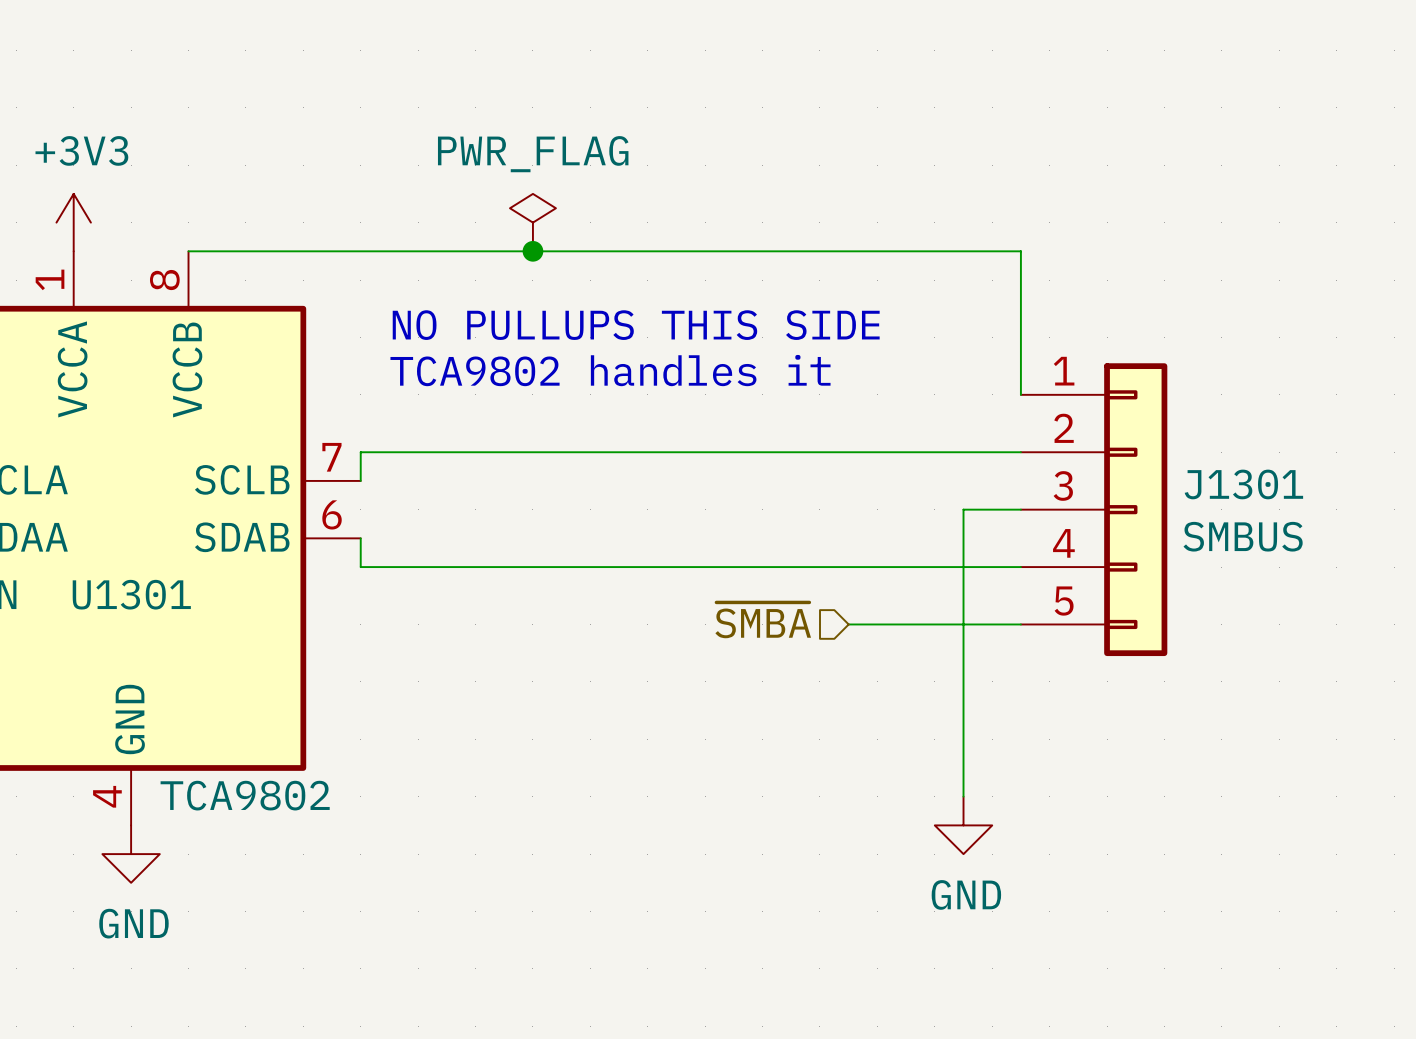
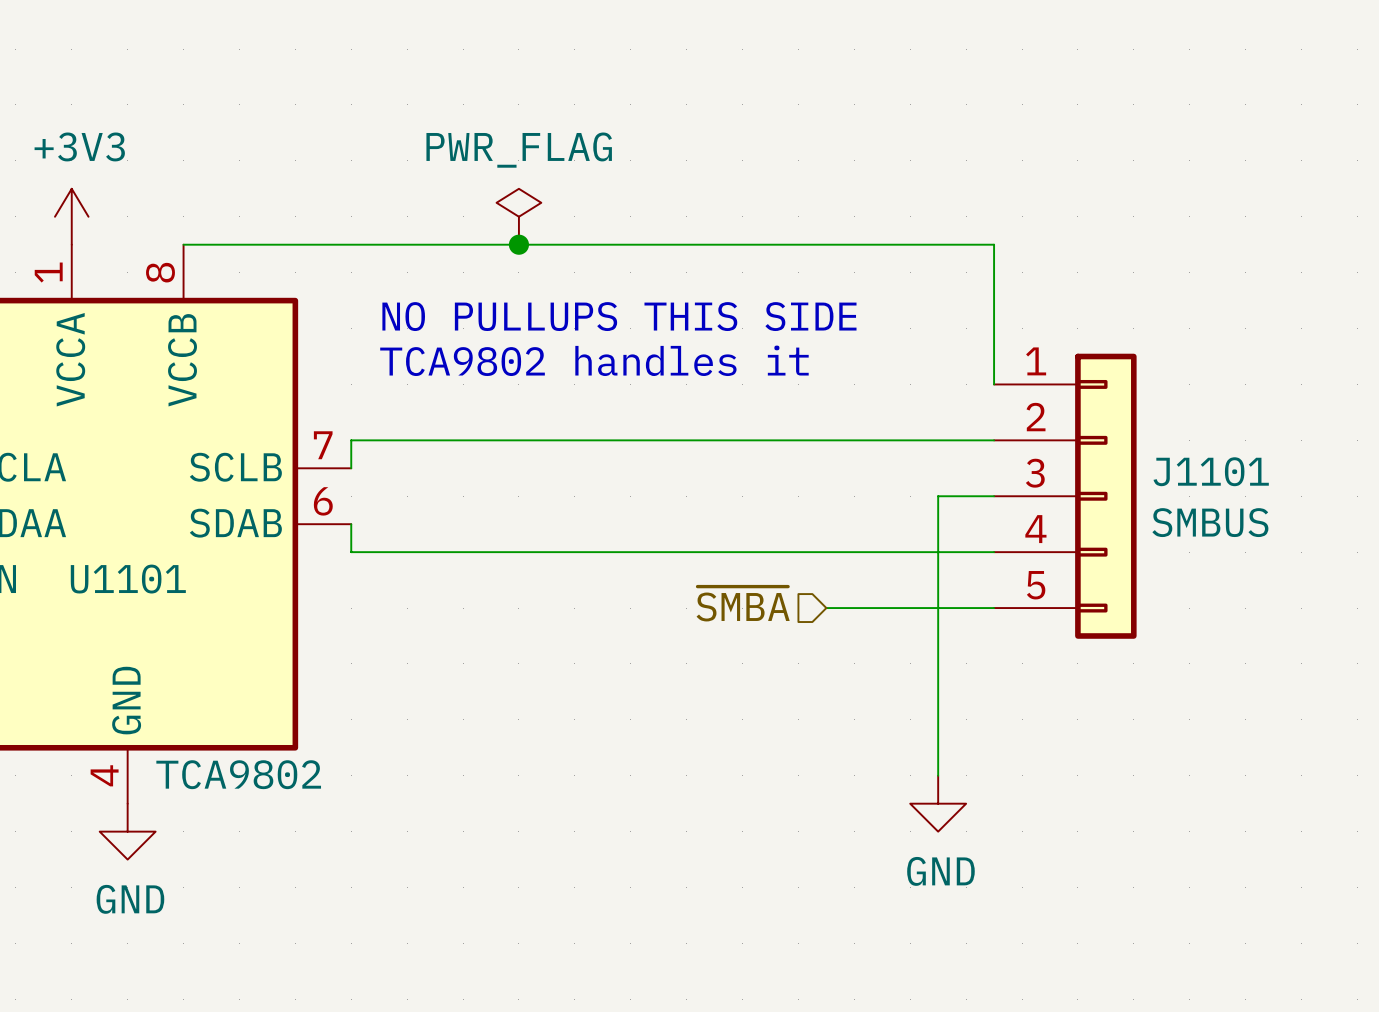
J1301 name: J1301 (1243, 484) -> J1101 (1211, 471)
U1301 name: U1301 (131, 594) -> U1101 (128, 579)

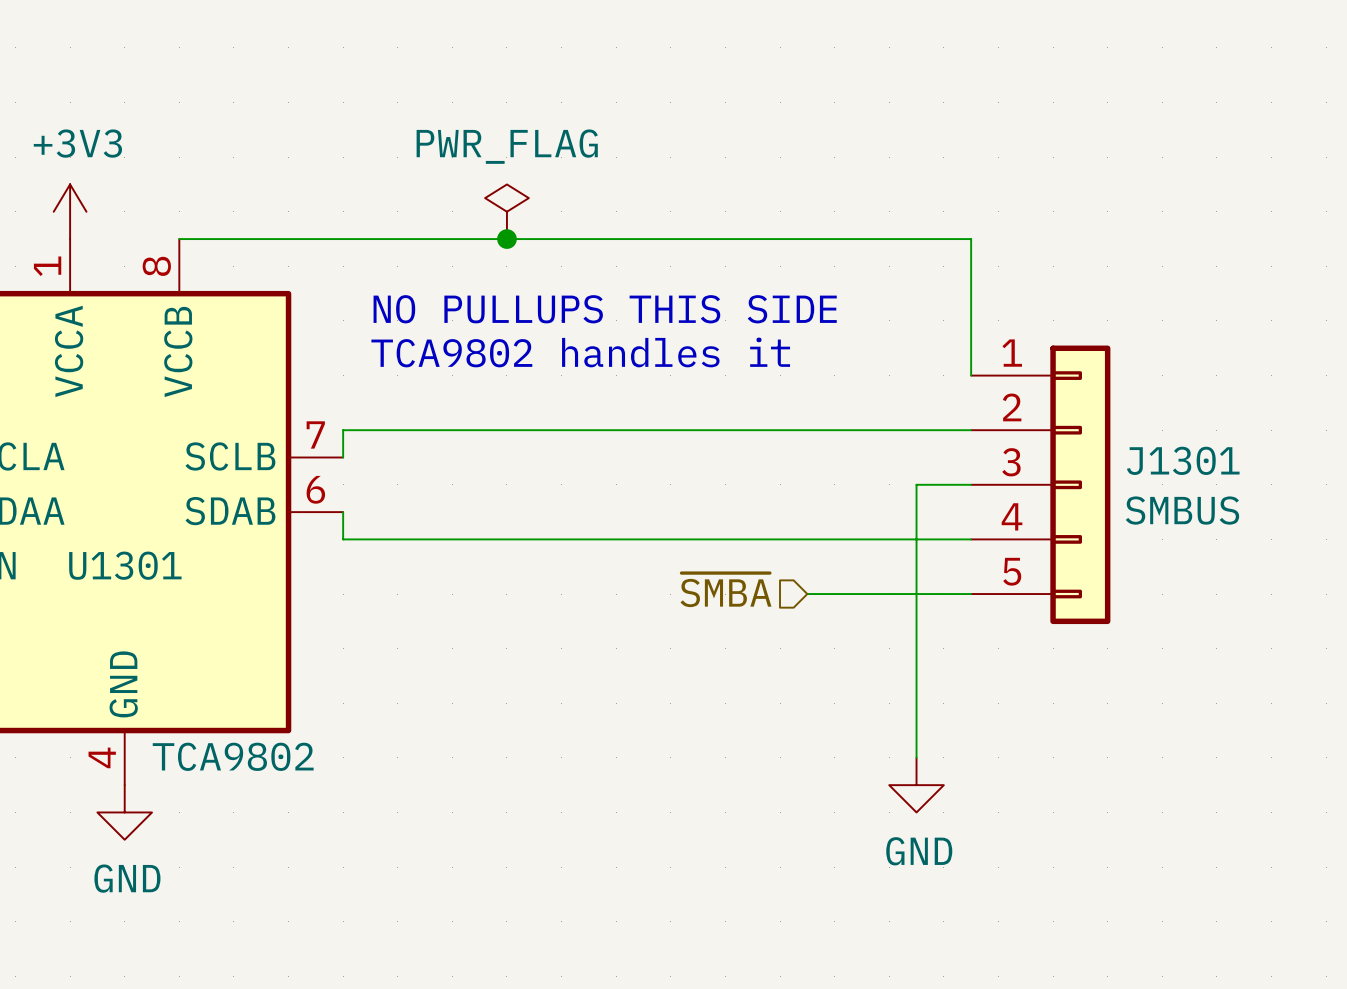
J1101 name: J1101 (1211, 471) -> J1301 (1183, 460)
U1101 name: U1101 (128, 579) -> U1301 (125, 565)

